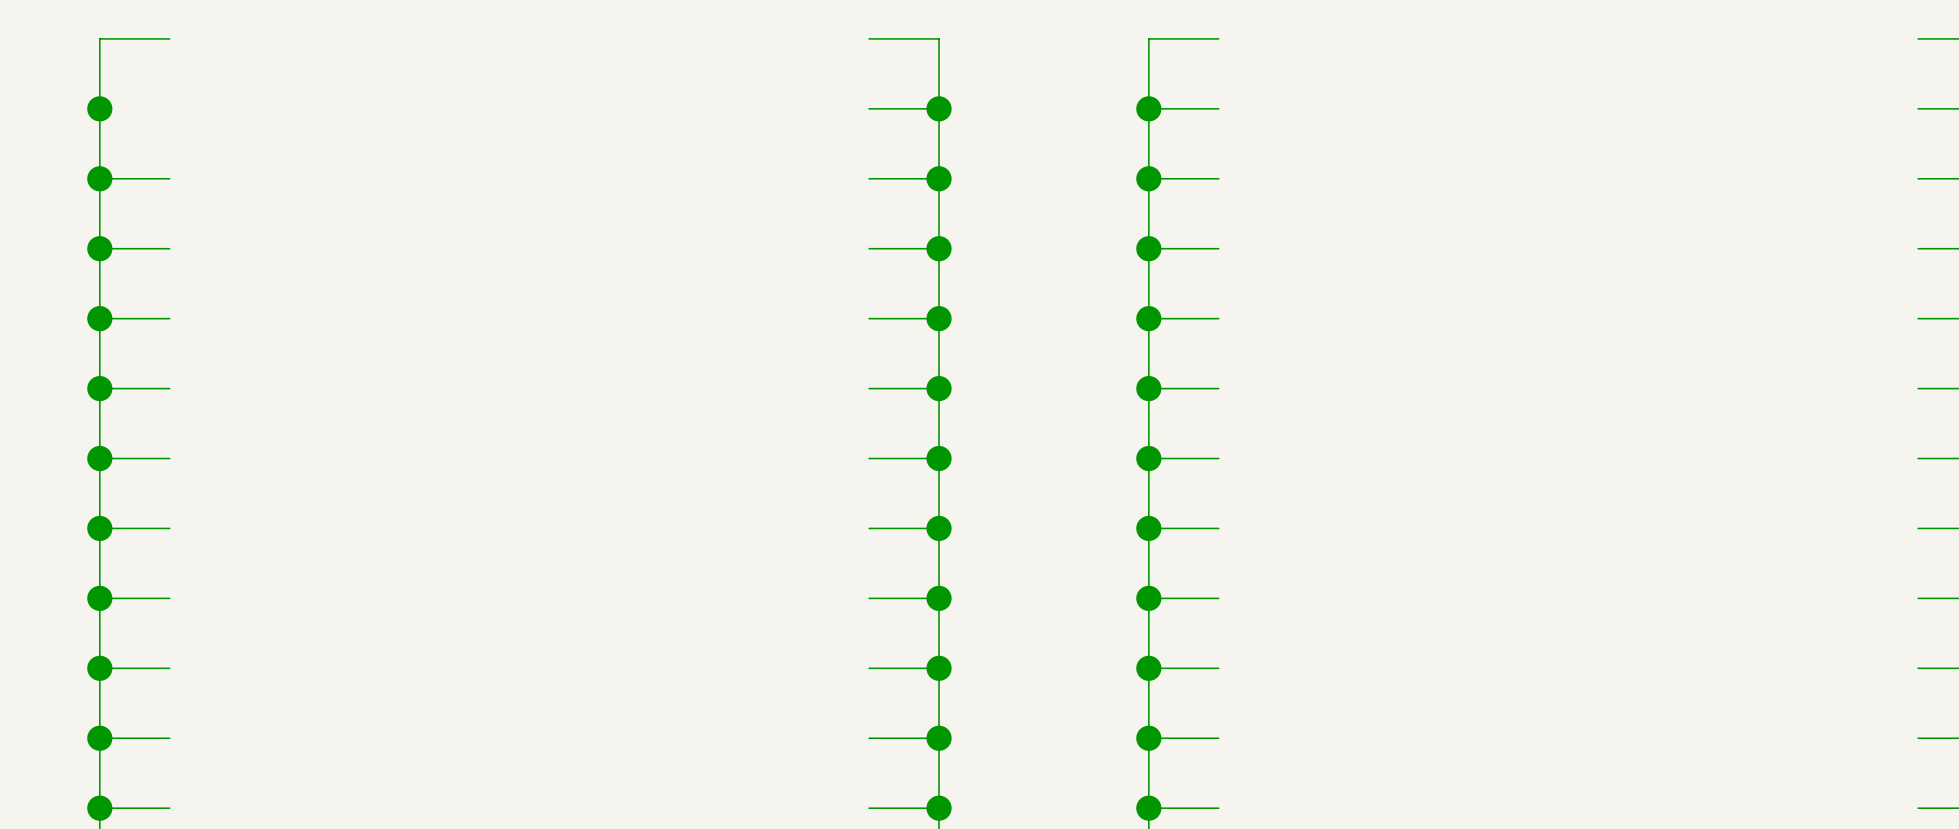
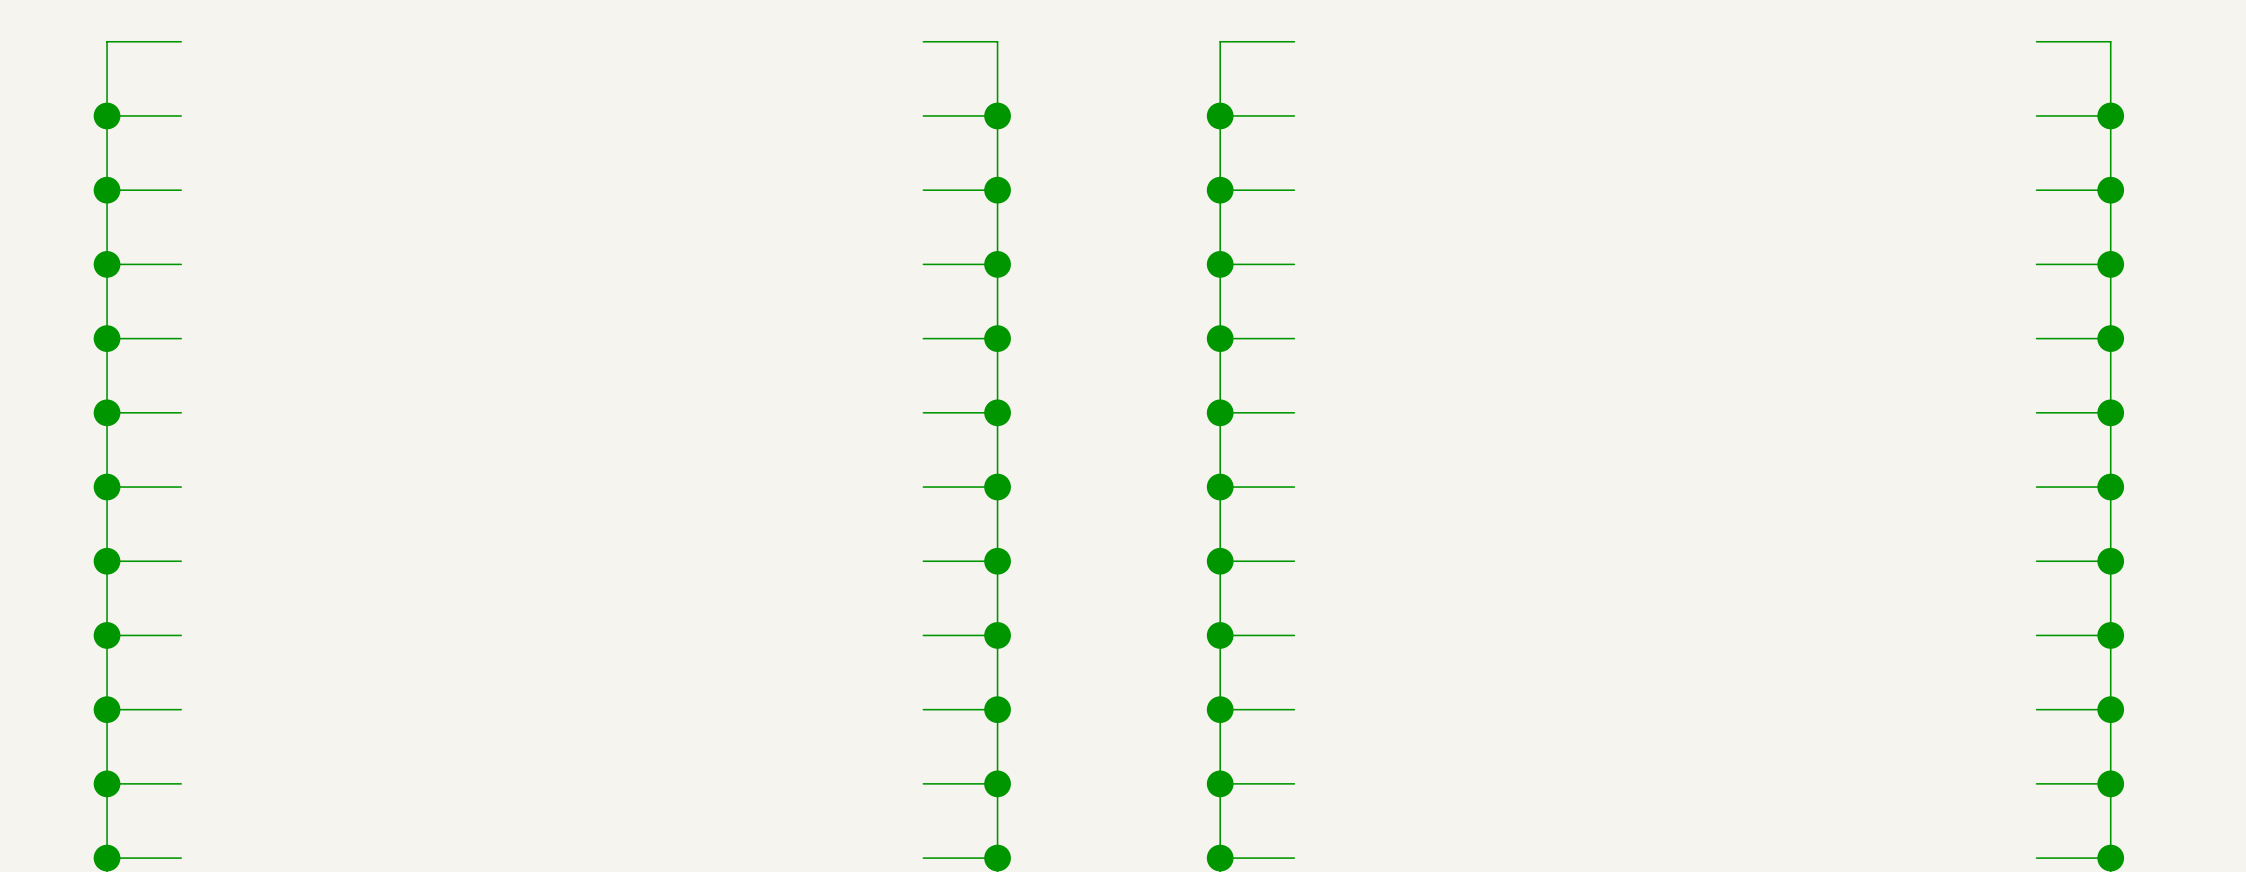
wire: none -> (107, 115) (181, 115)

